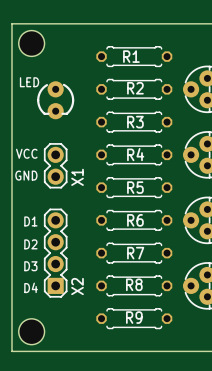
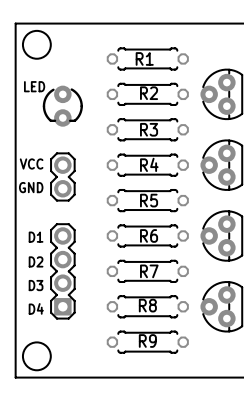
X1 name: X1 (77, 177) -> none
X2 name: X2 (77, 286) -> none

